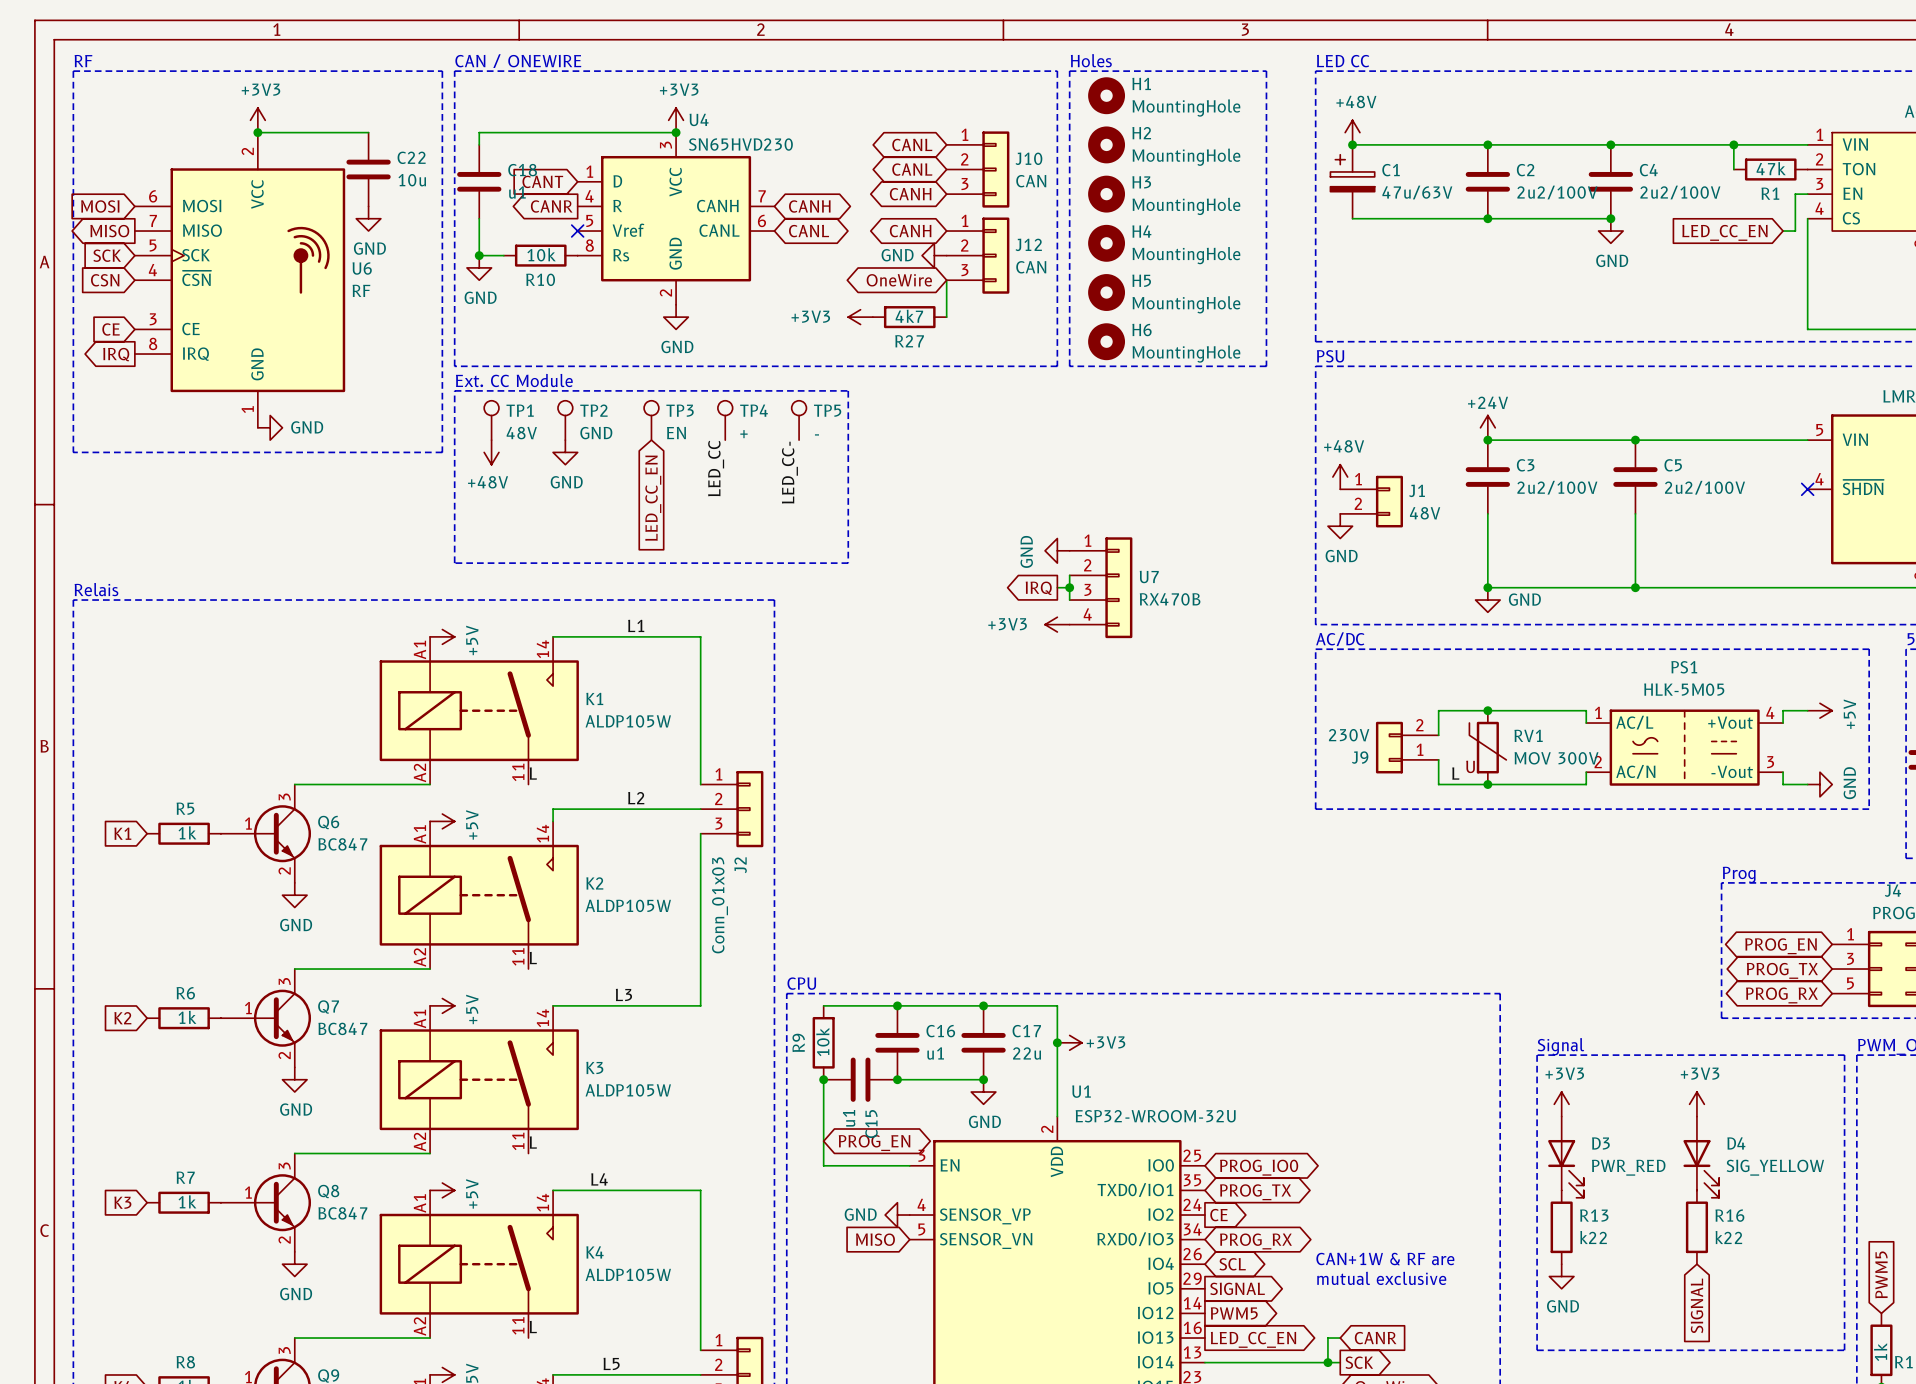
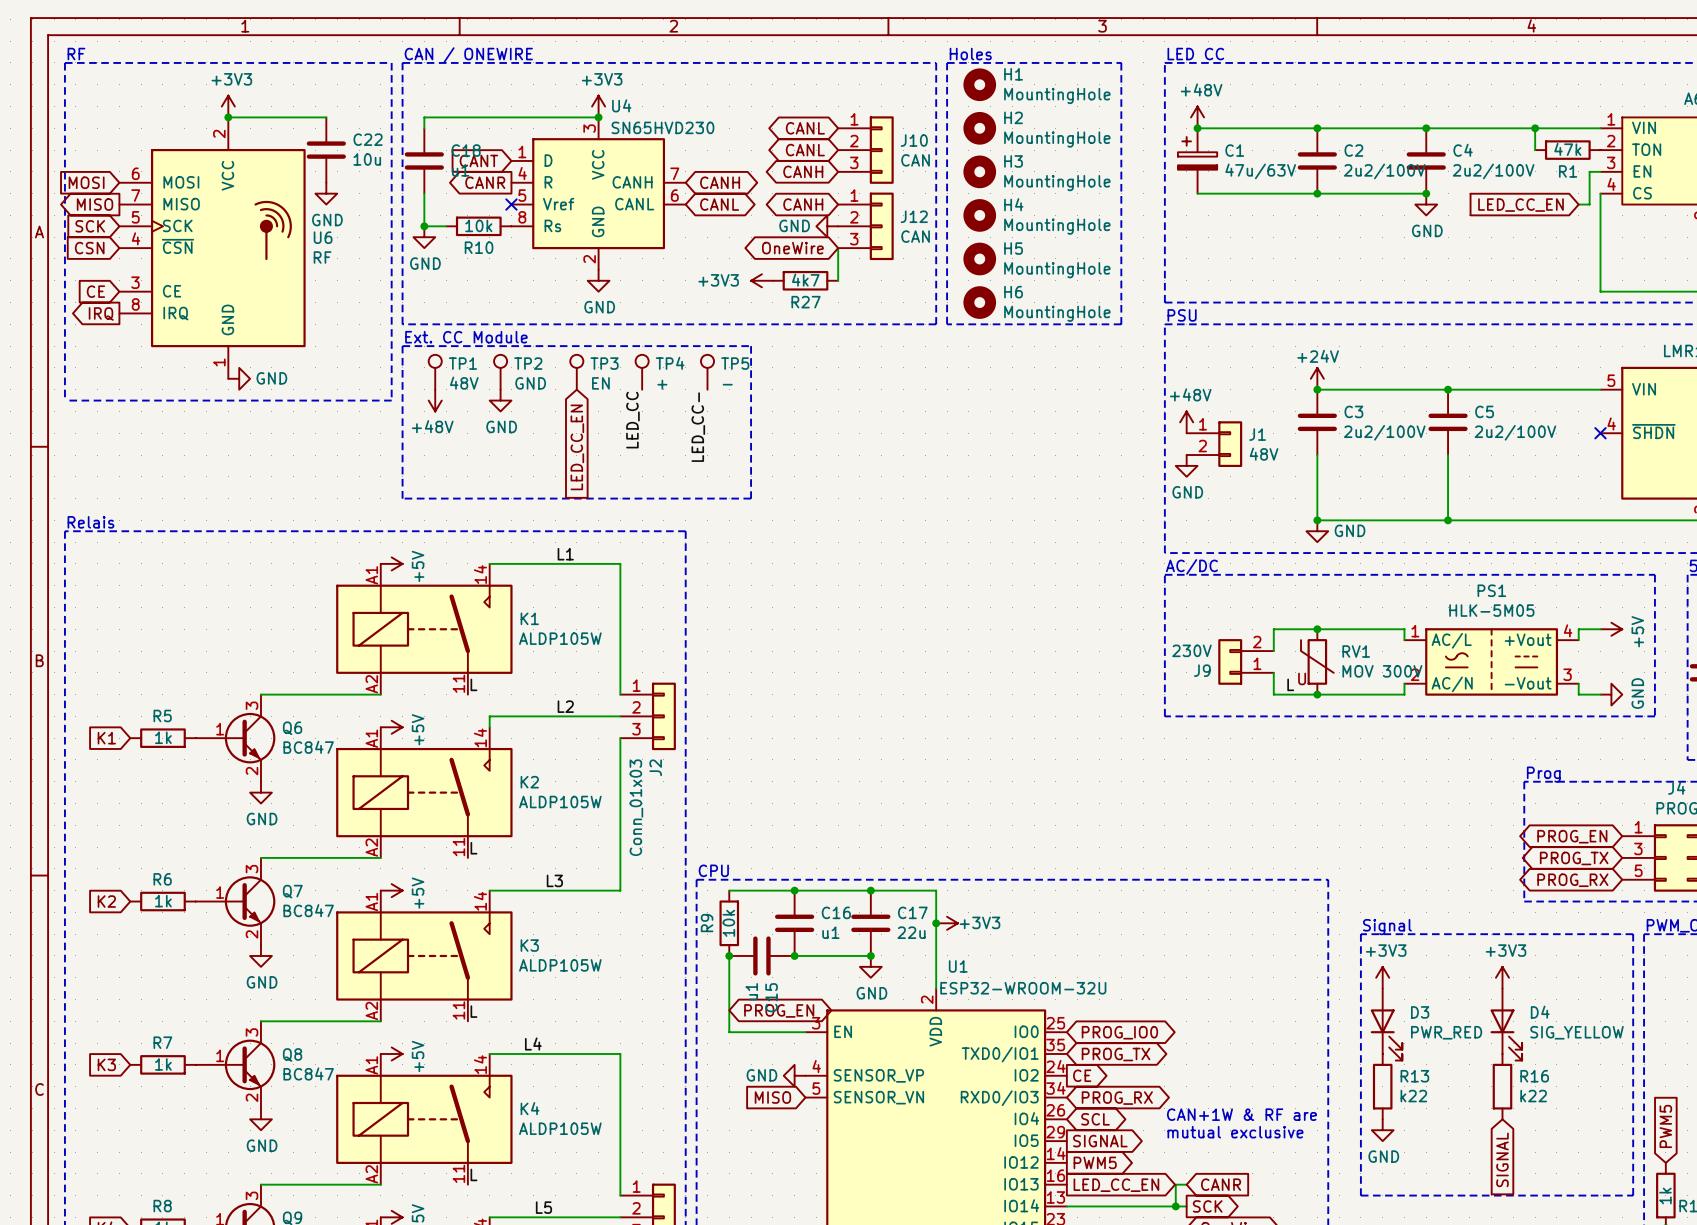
power symbol: GND (1057, 550) -> none
wire: (1069, 575) (1069, 600) -> none
wire: (1057, 587) (1069, 587) -> none
junction: (1069, 587) -> none
U7: RX470B (1101, 587) -> none
global label: IRQ (1038, 588) -> none
power symbol: +3V3 (1057, 624) -> none

